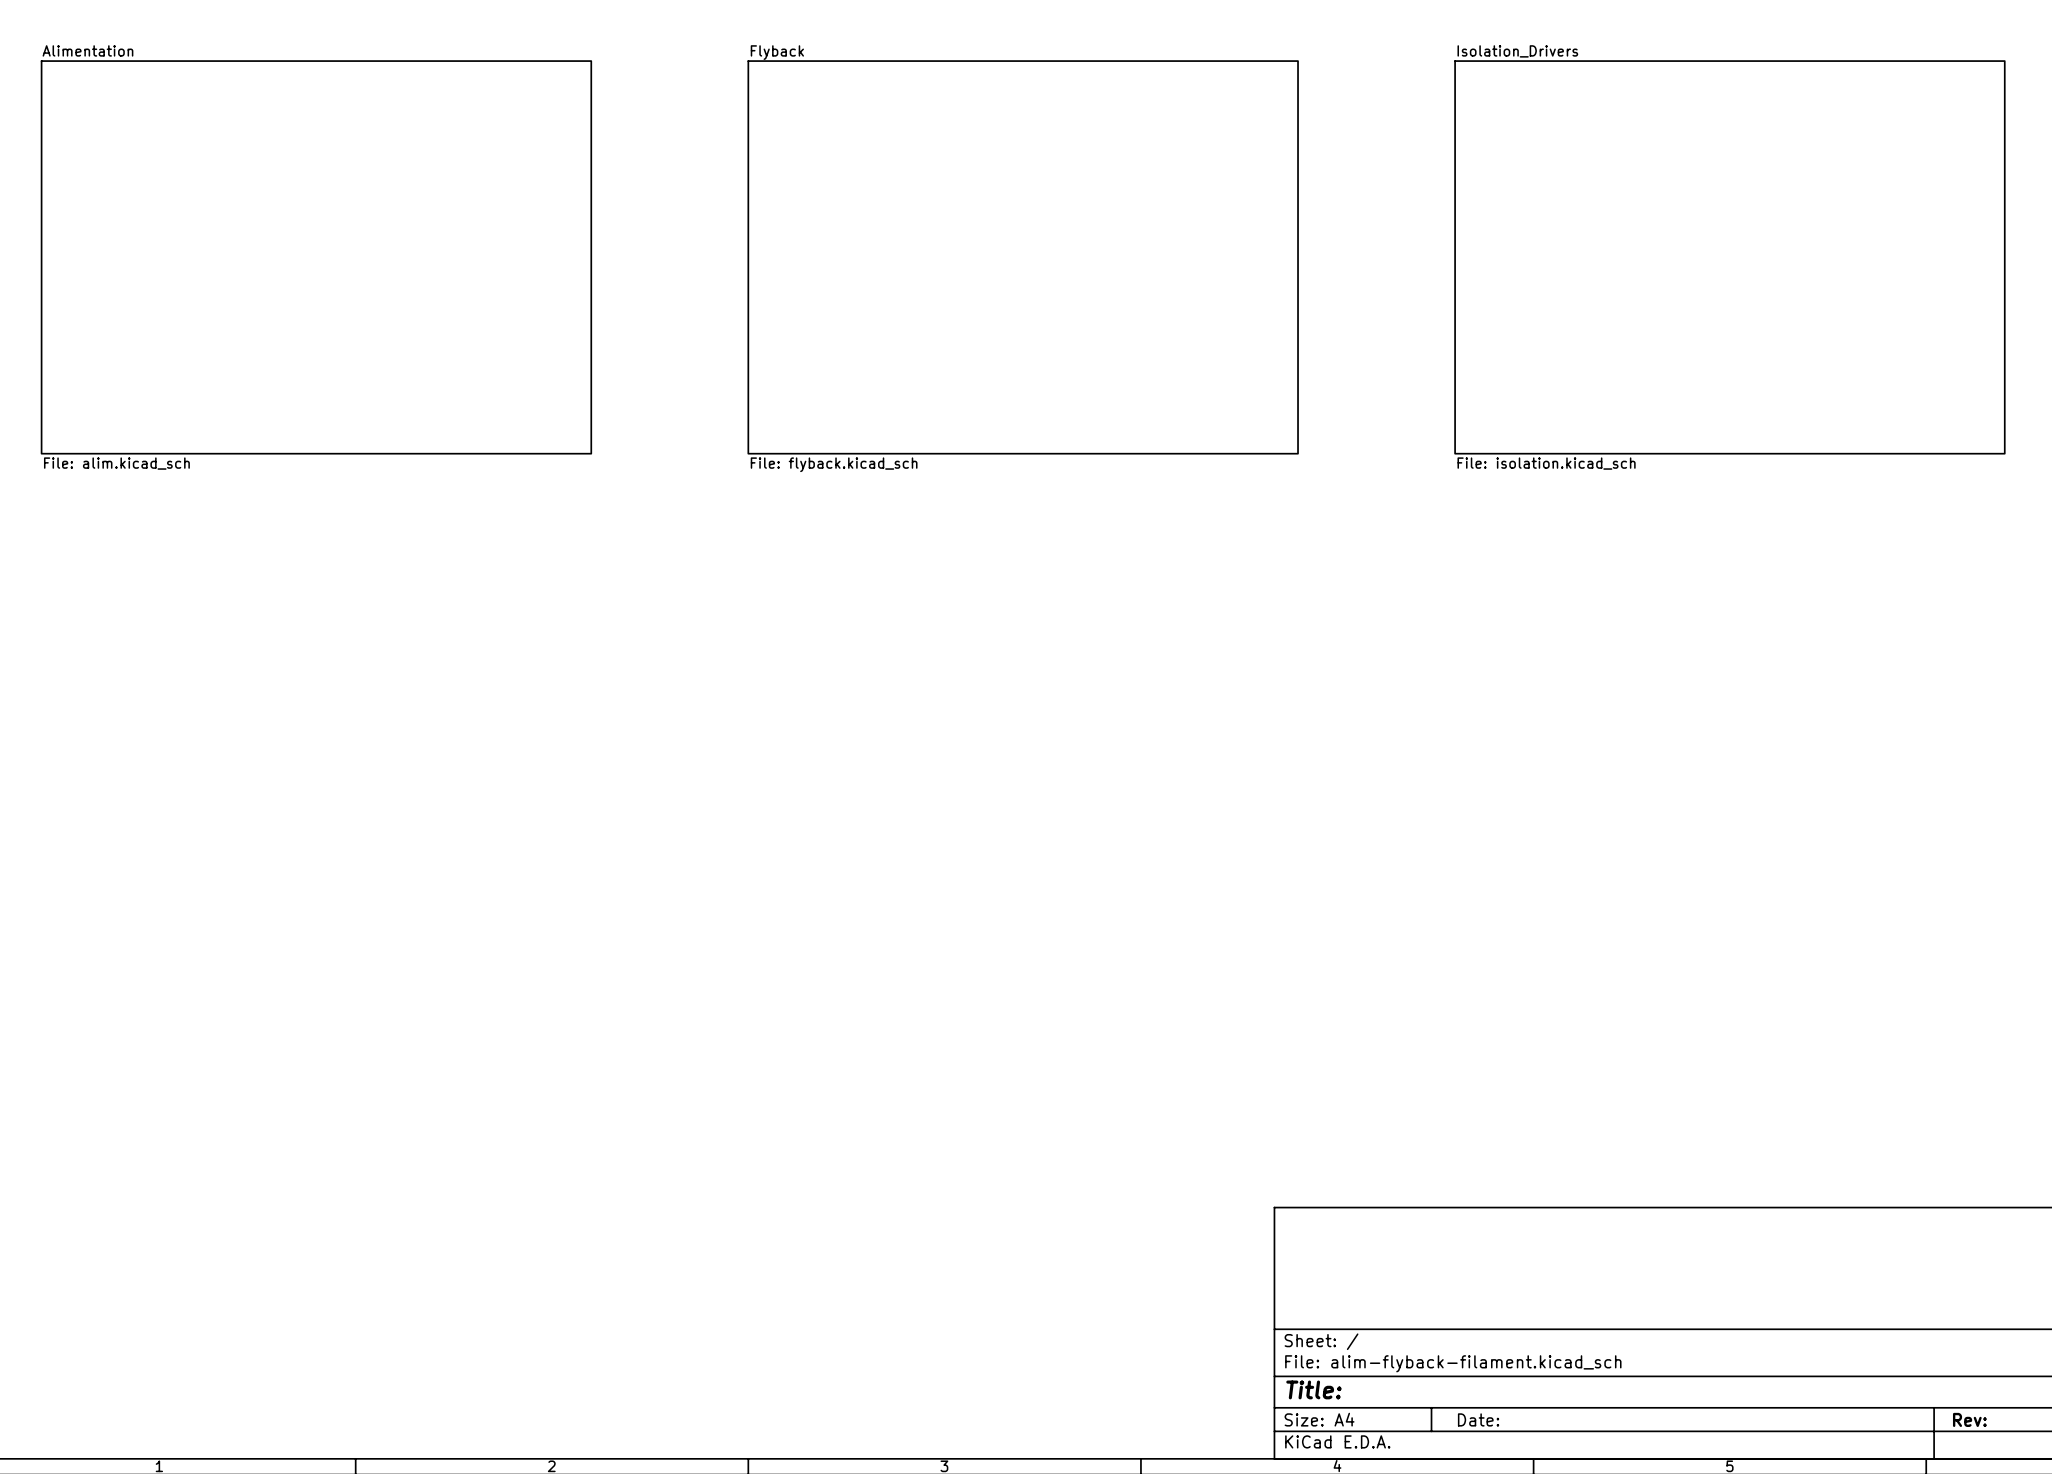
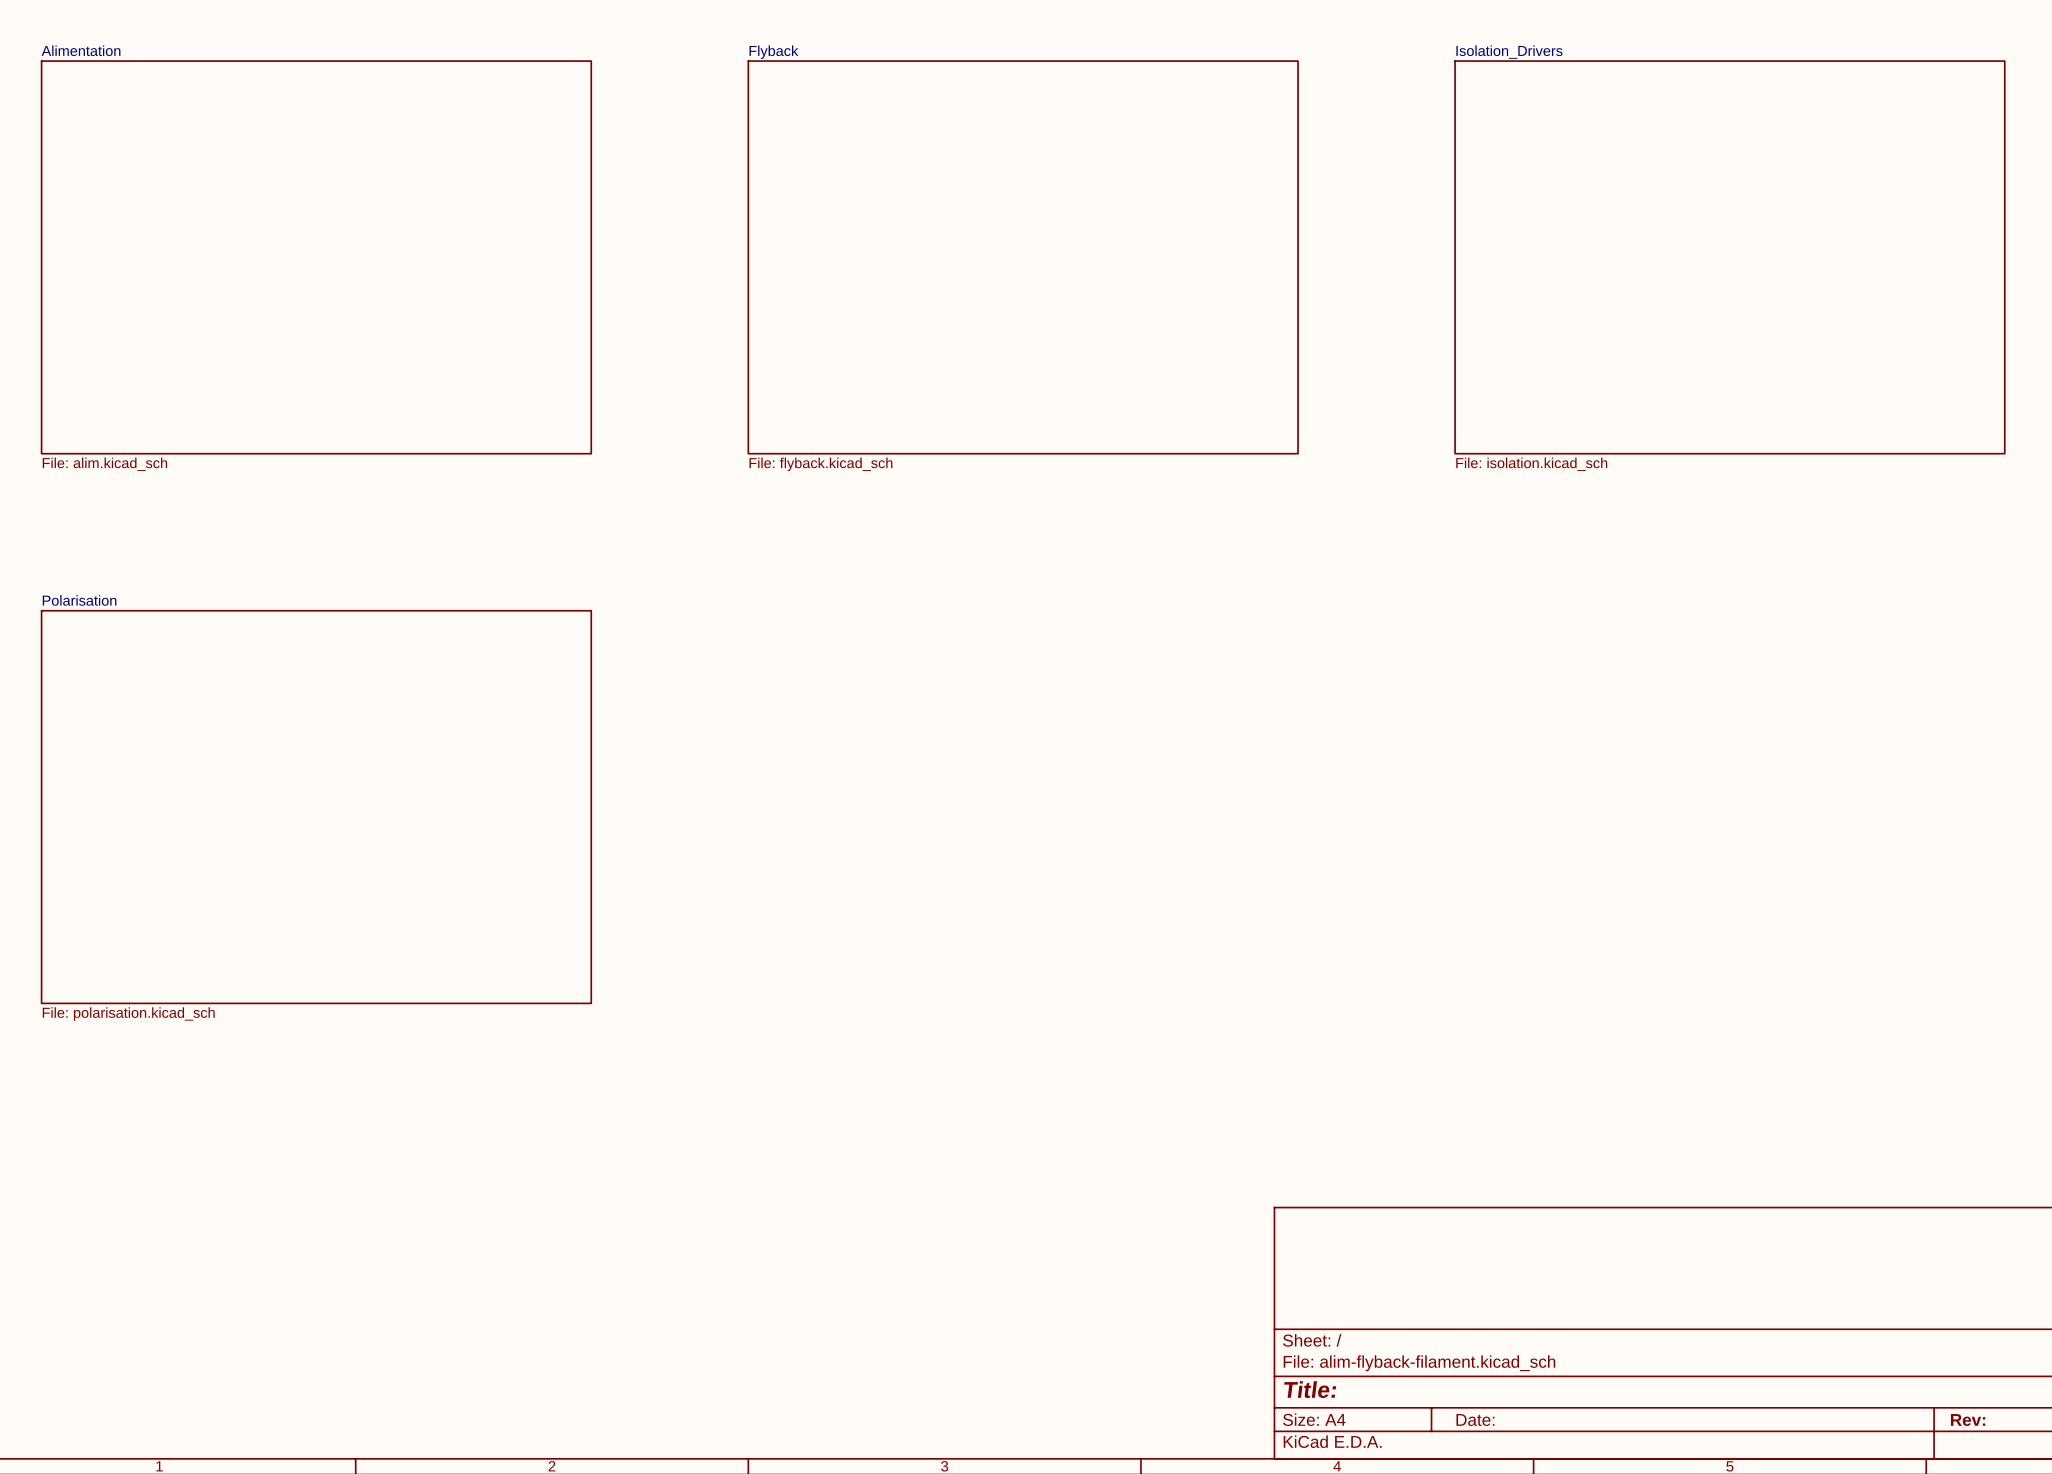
sheet Polarisation: none -> File: polarisation.kicad_sch (316, 807)

